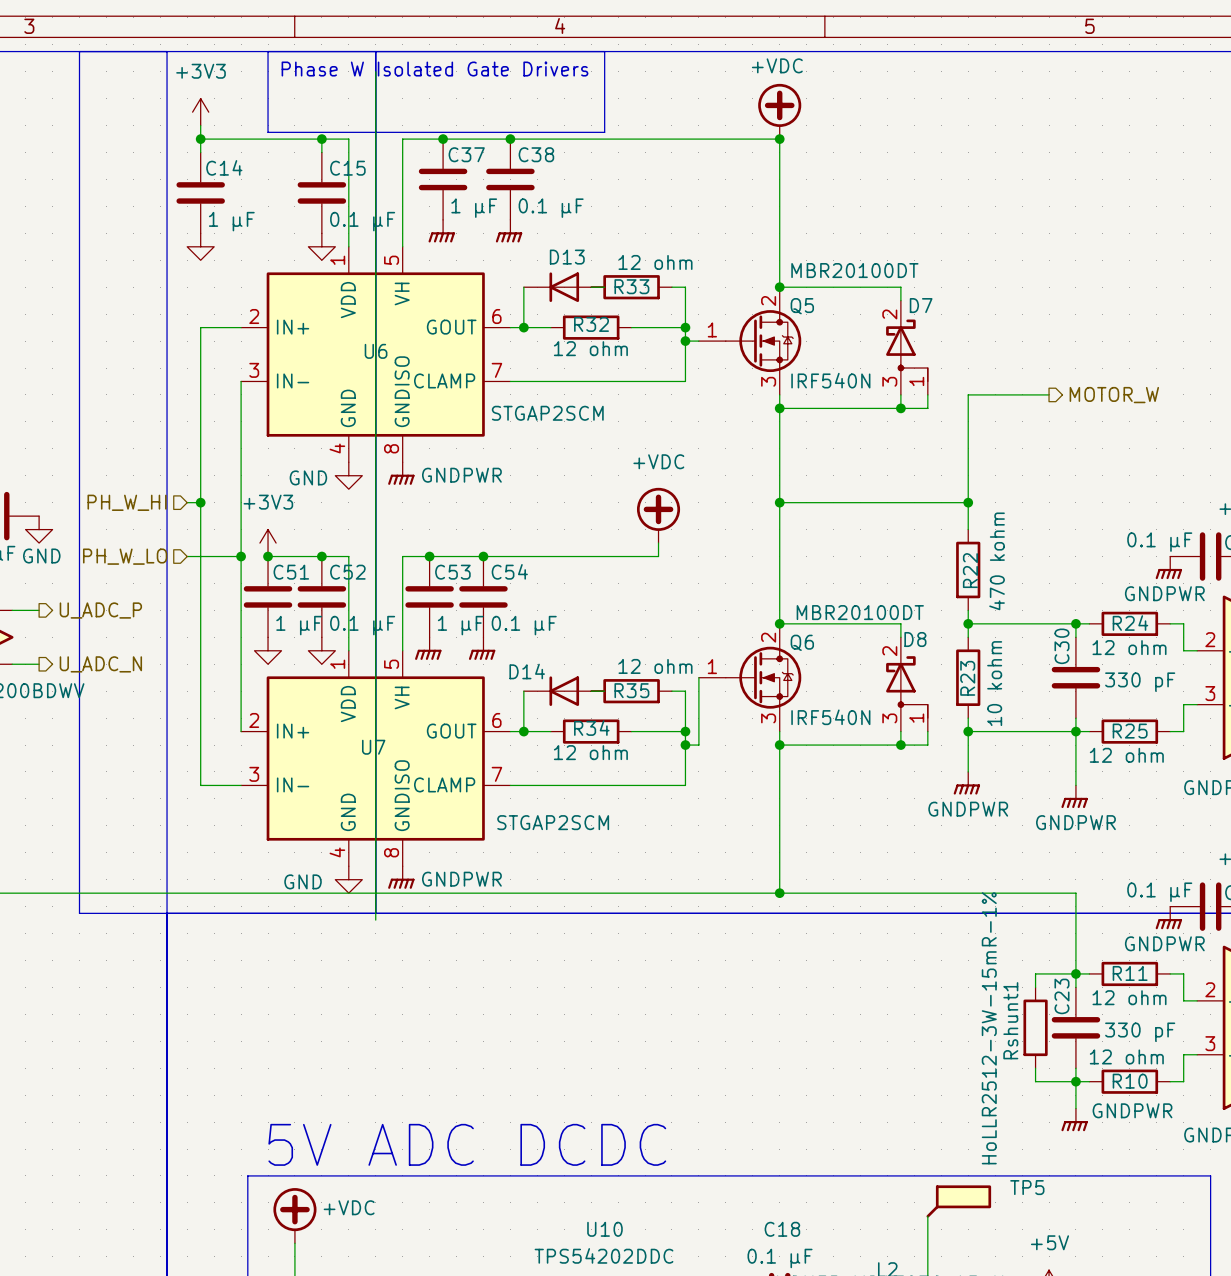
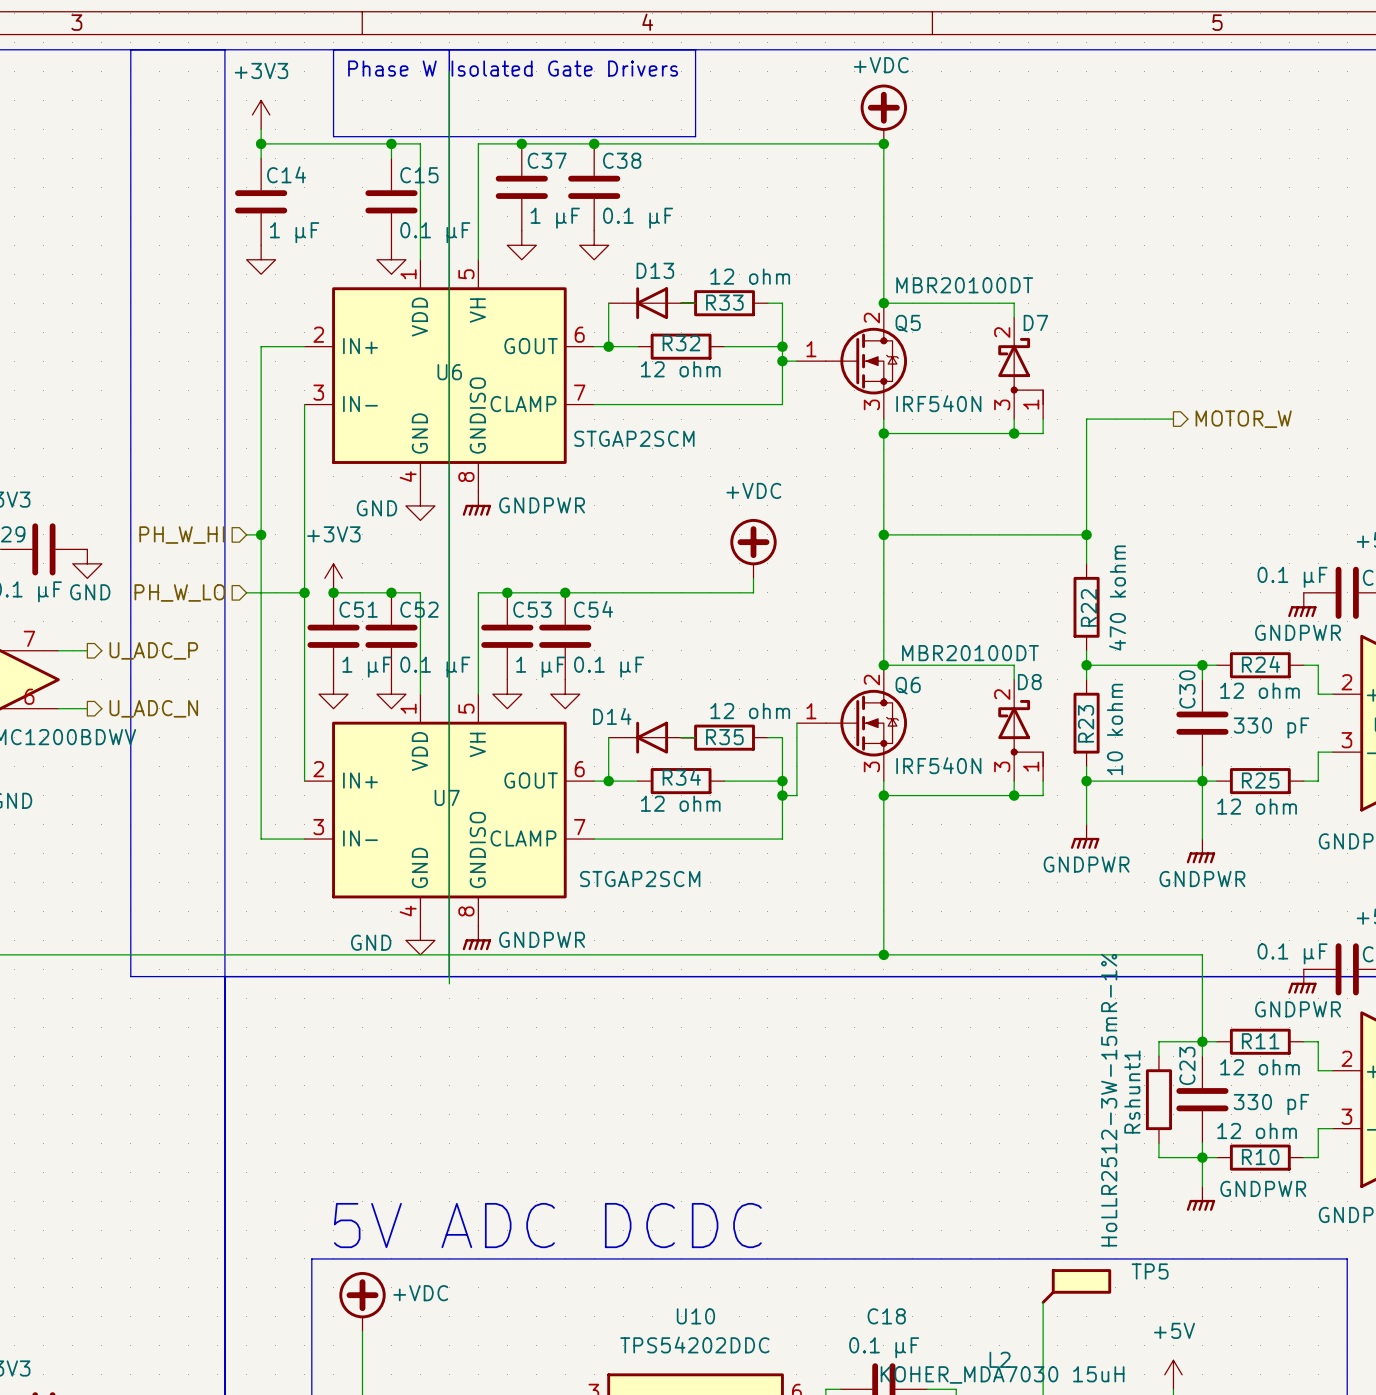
power symbol shape: [428, 219, 455, 243] -> [507, 230, 537, 260]
power symbol shape: [495, 219, 523, 243] -> [579, 230, 609, 260]
power symbol shape: [415, 637, 442, 660] -> [492, 679, 522, 709]
power symbol shape: [468, 637, 496, 660] -> [550, 679, 580, 709]

